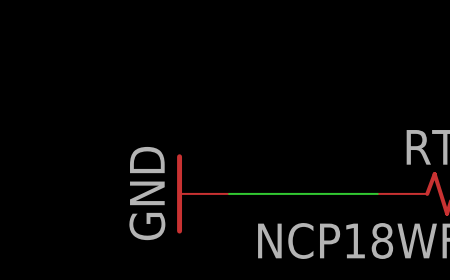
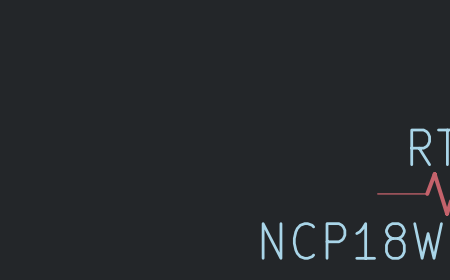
power symbol: GND (203, 193) -> none
wire: (229, 193) (377, 193) -> none

